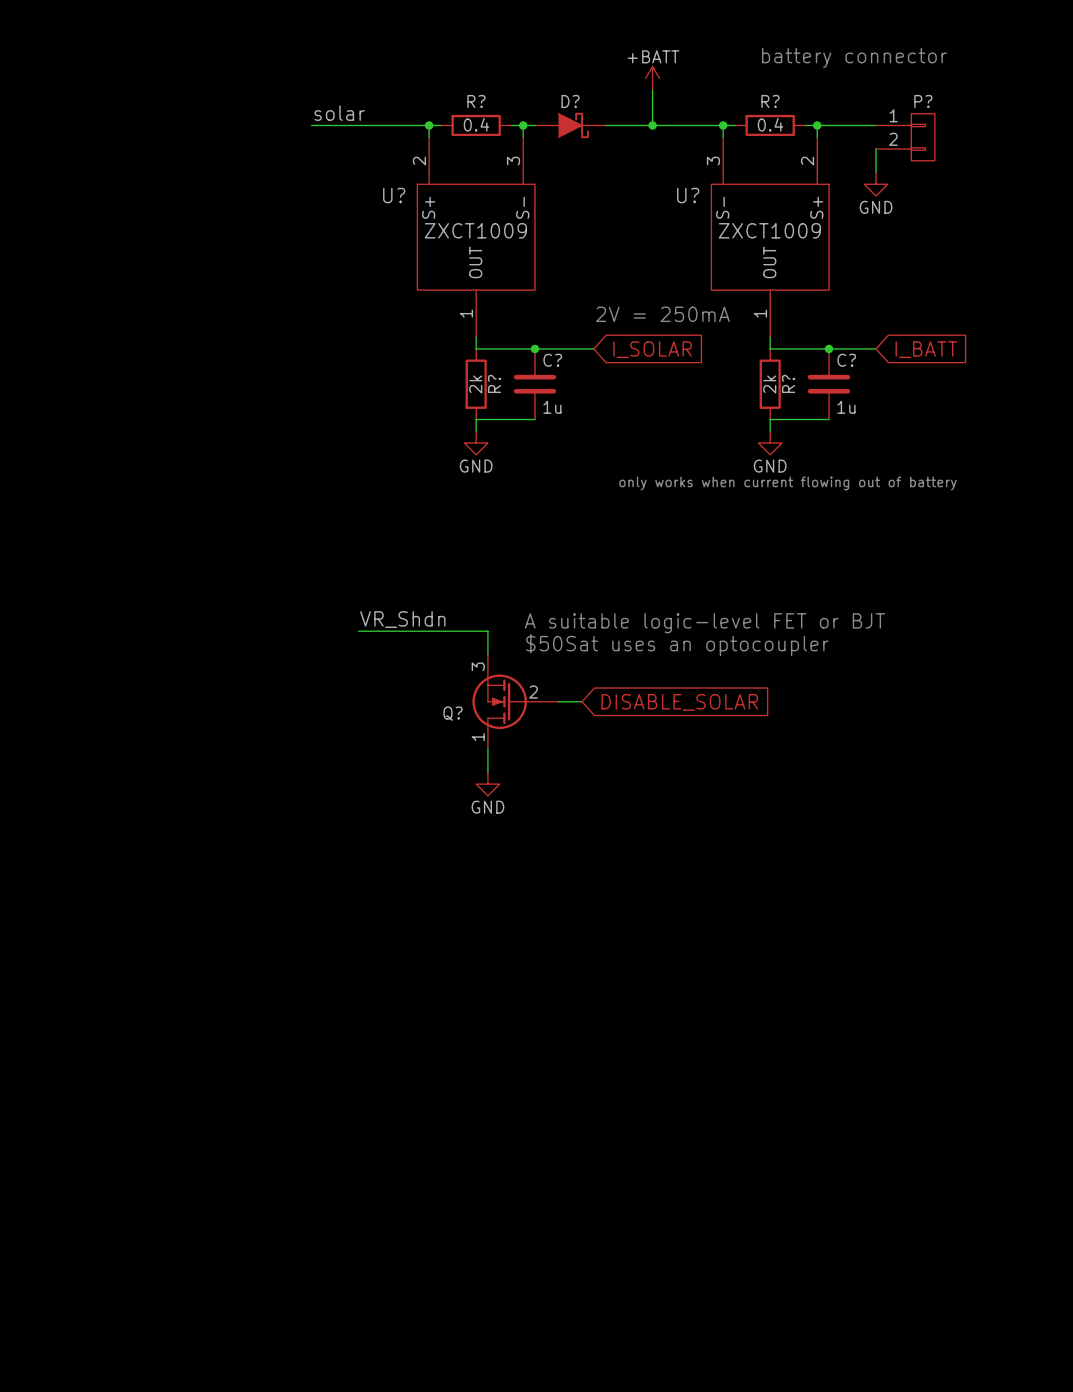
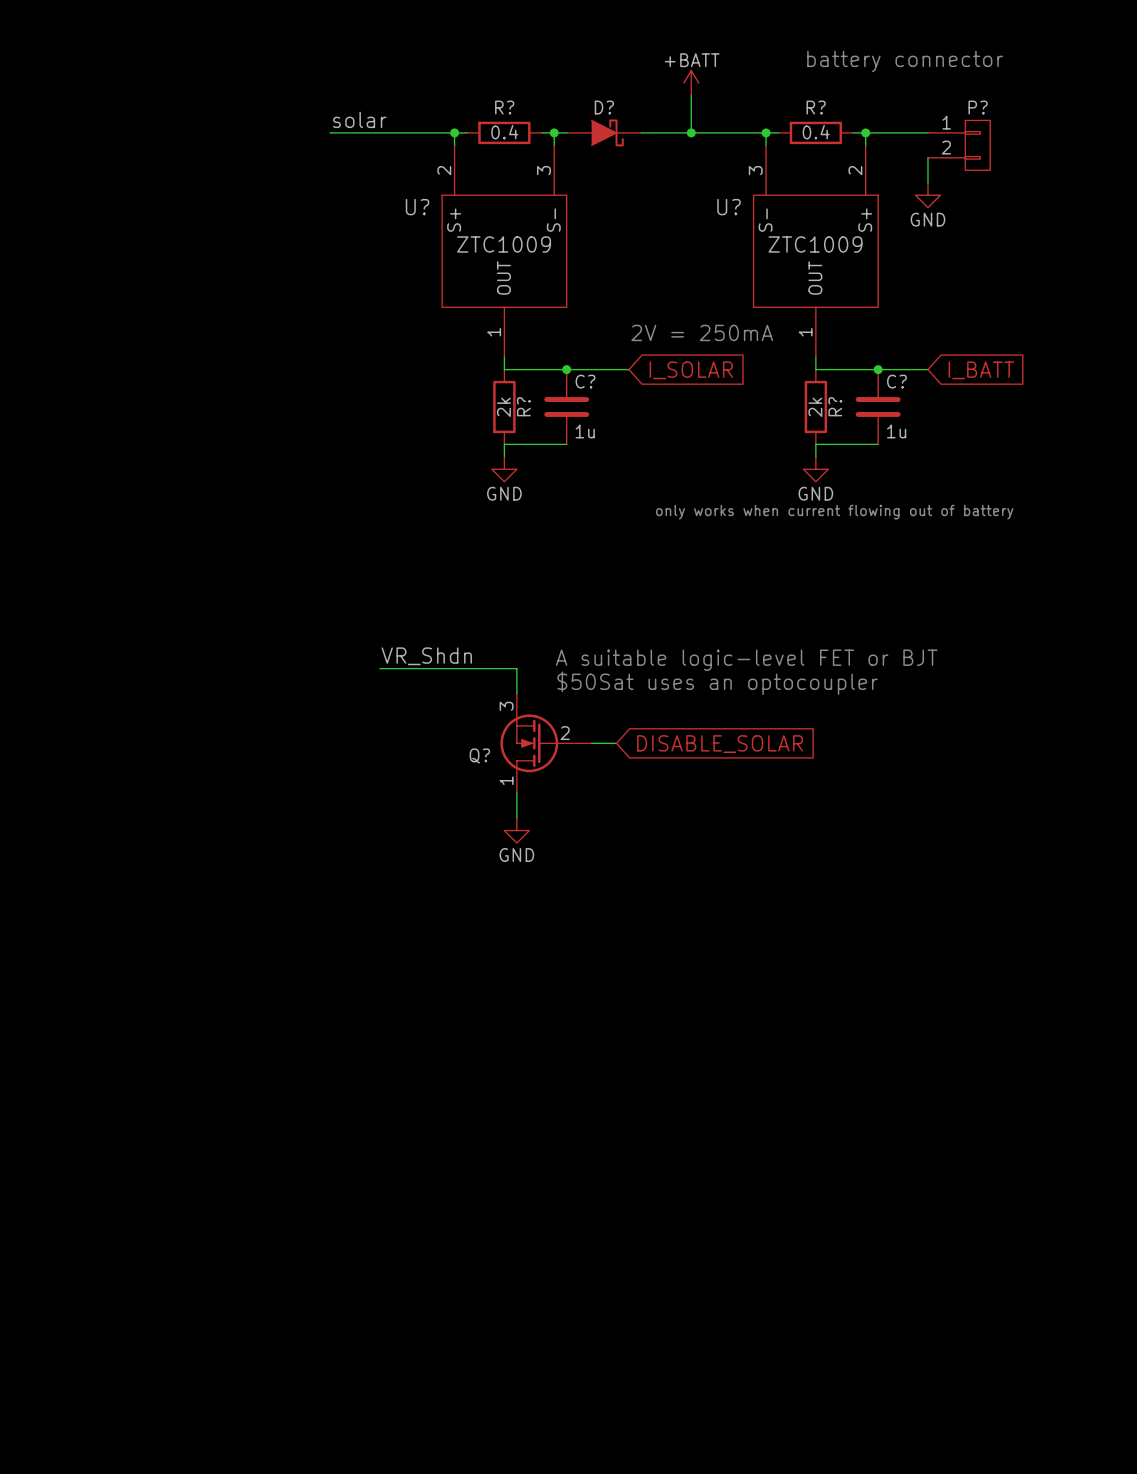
U? value: ZXCT1009 (475, 230) -> ZTC1009 (504, 244)
U? value: ZXCT1009 (769, 230) -> ZTC1009 (815, 244)

